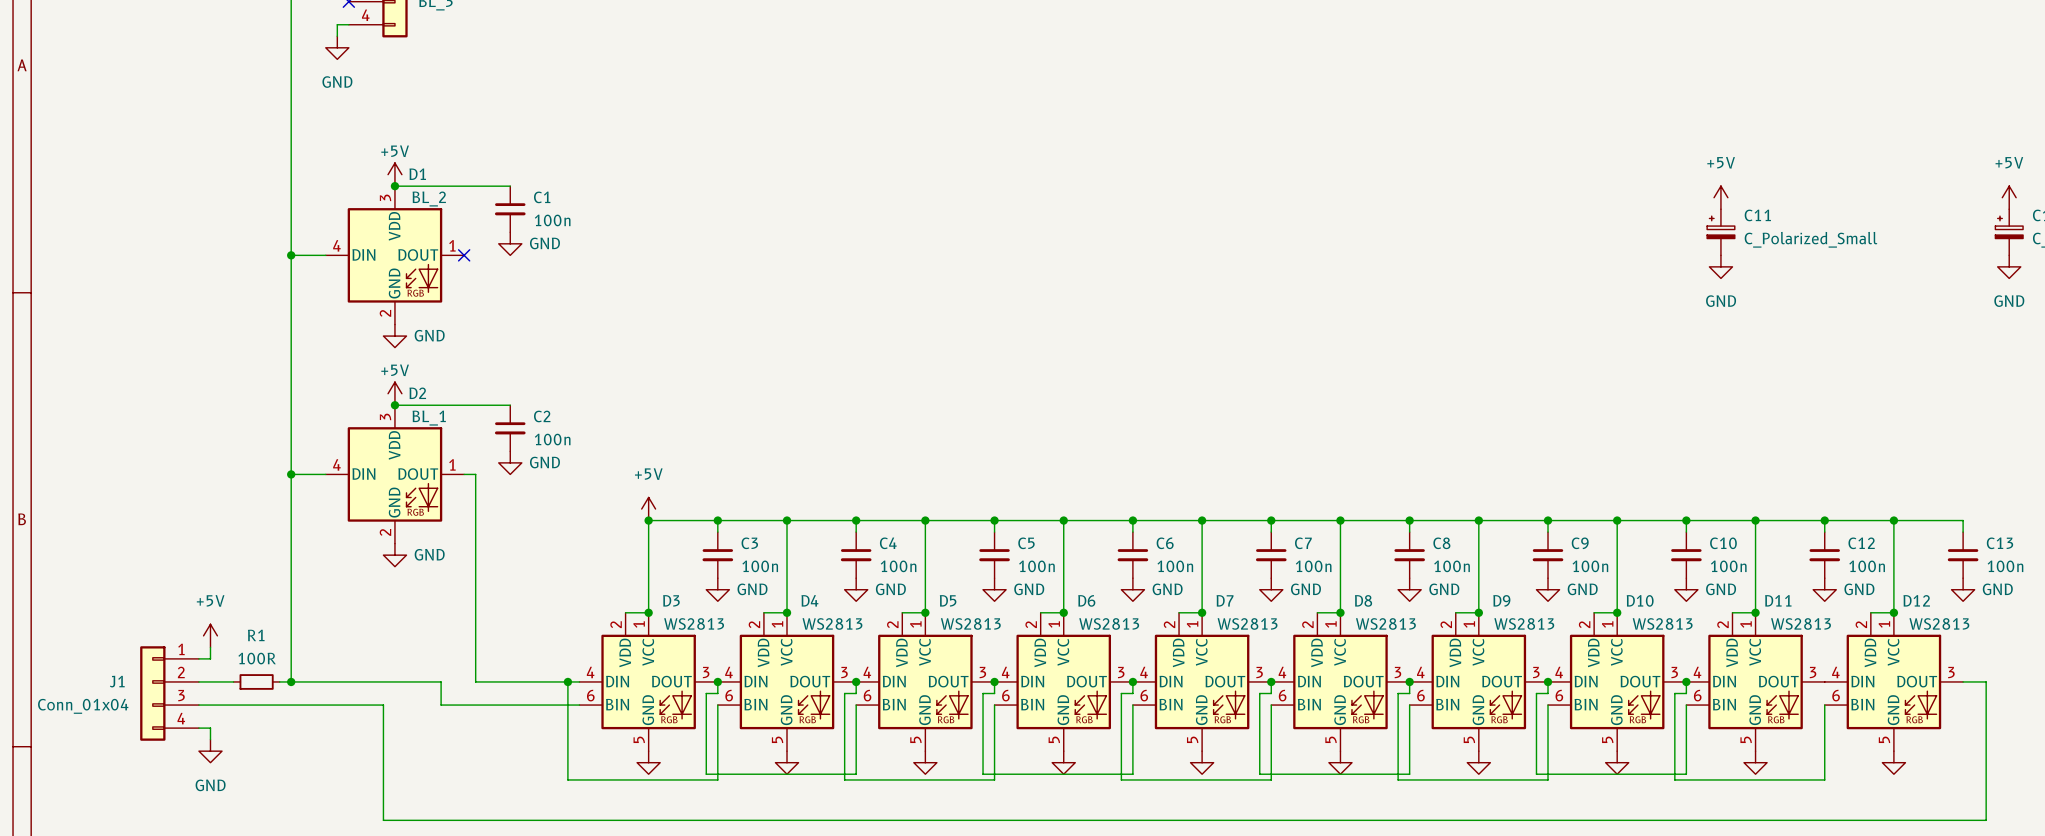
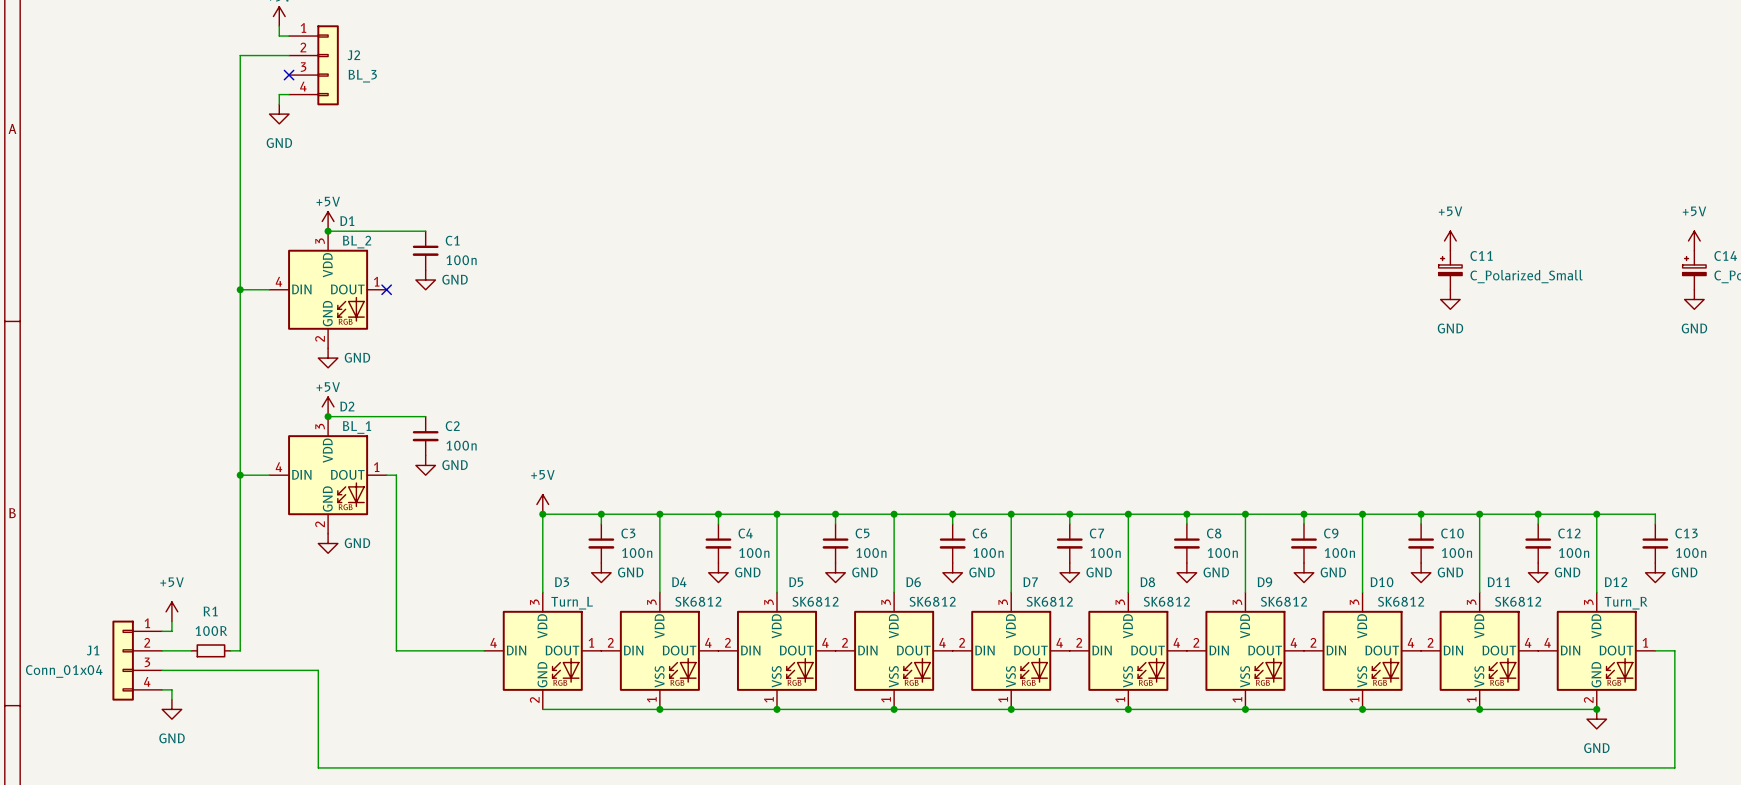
D3 symbol: [579, 612, 718, 752] -> [484, 592, 602, 710]
wire: (625, 612) (648, 612) -> none
junction: (648, 612) -> none
D4 symbol: [717, 612, 857, 752] -> [601, 592, 719, 710]
wire: (763, 612) (787, 612) -> none
junction: (787, 612) -> none
D5 symbol: [856, 612, 995, 752] -> [718, 592, 836, 710]
wire: (902, 612) (925, 612) -> none
junction: (925, 612) -> none
D6 symbol: [994, 612, 1133, 752] -> [835, 592, 953, 710]
wire: (1040, 612) (1063, 612) -> none
junction: (1063, 612) -> none
D7 symbol: [1132, 612, 1272, 752] -> [952, 592, 1070, 710]
wire: (1179, 612) (1202, 612) -> none
junction: (1202, 612) -> none
D8 symbol: [1271, 612, 1410, 752] -> [1069, 592, 1187, 710]
wire: (1317, 612) (1340, 612) -> none
junction: (1340, 612) -> none
D9 symbol: [1409, 612, 1549, 752] -> [1186, 592, 1304, 710]
wire: (1455, 612) (1478, 612) -> none
junction: (1478, 612) -> none
D10 symbol: [1548, 612, 1687, 752] -> [1303, 592, 1422, 710]
wire: (1594, 612) (1617, 612) -> none
junction: (1617, 612) -> none
D11 symbol: [1686, 612, 1825, 752] -> [1421, 592, 1539, 710]
wire: (1732, 612) (1755, 612) -> none
junction: (1755, 612) -> none
D12 symbol: [1824, 612, 1964, 752] -> [1538, 592, 1656, 710]
wire: (1870, 612) (1893, 612) -> none
junction: (1893, 612) -> none
D3 value: WS2813 (694, 623) -> Turn_L (572, 603)
D4 value: WS2813 (832, 623) -> SK6812 (698, 601)
D5 value: WS2813 (970, 623) -> SK6812 (815, 601)
D6 value: WS2813 (1109, 623) -> SK6812 (932, 601)
D7 value: WS2813 (1247, 623) -> SK6812 (1049, 601)
D8 value: WS2813 (1385, 623) -> SK6812 (1166, 601)
D9 value: WS2813 (1524, 623) -> SK6812 (1283, 601)
D10 value: WS2813 (1662, 623) -> SK6812 (1401, 601)
D11 value: WS2813 (1801, 623) -> SK6812 (1518, 601)
D12 value: WS2813 (1939, 623) -> Turn_R (1626, 603)
wire: (291, 681) (441, 681) (441, 705) (579, 705) -> none
junction: (291, 681) -> none
wire: (567, 681) (567, 779) (717, 779) (717, 705) -> none
junction: (567, 681) -> none
wire: (717, 681) (717, 693) (706, 693) (706, 774) (856, 774) (856, 705) -> none
junction: (717, 681) -> none
wire: (856, 681) (856, 693) (844, 693) (844, 779) (994, 779) (994, 705) -> none
junction: (856, 681) -> none
wire: (994, 681) (994, 693) (983, 693) (983, 774) (1132, 774) (1132, 705) -> none
junction: (994, 681) -> none
wire: (1132, 681) (1132, 693) (1121, 693) (1121, 779) (1271, 779) (1271, 705) -> none
junction: (1132, 681) -> none
wire: (1271, 681) (1271, 693) (1259, 693) (1259, 774) (1409, 774) (1409, 705) -> none
junction: (1271, 681) -> none
wire: (1409, 681) (1409, 693) (1398, 693) (1398, 779) (1548, 779) (1548, 705) -> none
junction: (1409, 681) -> none
wire: (1548, 681) (1548, 693) (1536, 693) (1536, 774) (1686, 774) (1686, 705) -> none
junction: (1548, 681) -> none
wire: (1686, 681) (1686, 693) (1674, 693) (1674, 779) (1824, 779) (1824, 705) -> none
junction: (1686, 681) -> none
wire: none -> (542, 709) (1596, 709)
junction: none -> (659, 709)
junction: none -> (777, 709)
junction: none -> (894, 709)
junction: none -> (1011, 709)
junction: none -> (1128, 709)
junction: none -> (1245, 709)
junction: none -> (1362, 709)
junction: none -> (1479, 709)
junction: none -> (1596, 709)
power symbol: (648, 762) -> none
power symbol: (787, 762) -> none
power symbol: (925, 762) -> none
power symbol: (1063, 762) -> none
power symbol: (1202, 762) -> none
power symbol: (1340, 762) -> none
power symbol: (1478, 762) -> none
power symbol: (1617, 762) -> none
power symbol: (1755, 762) -> none
power symbol text: none -> GND (1596, 748)

